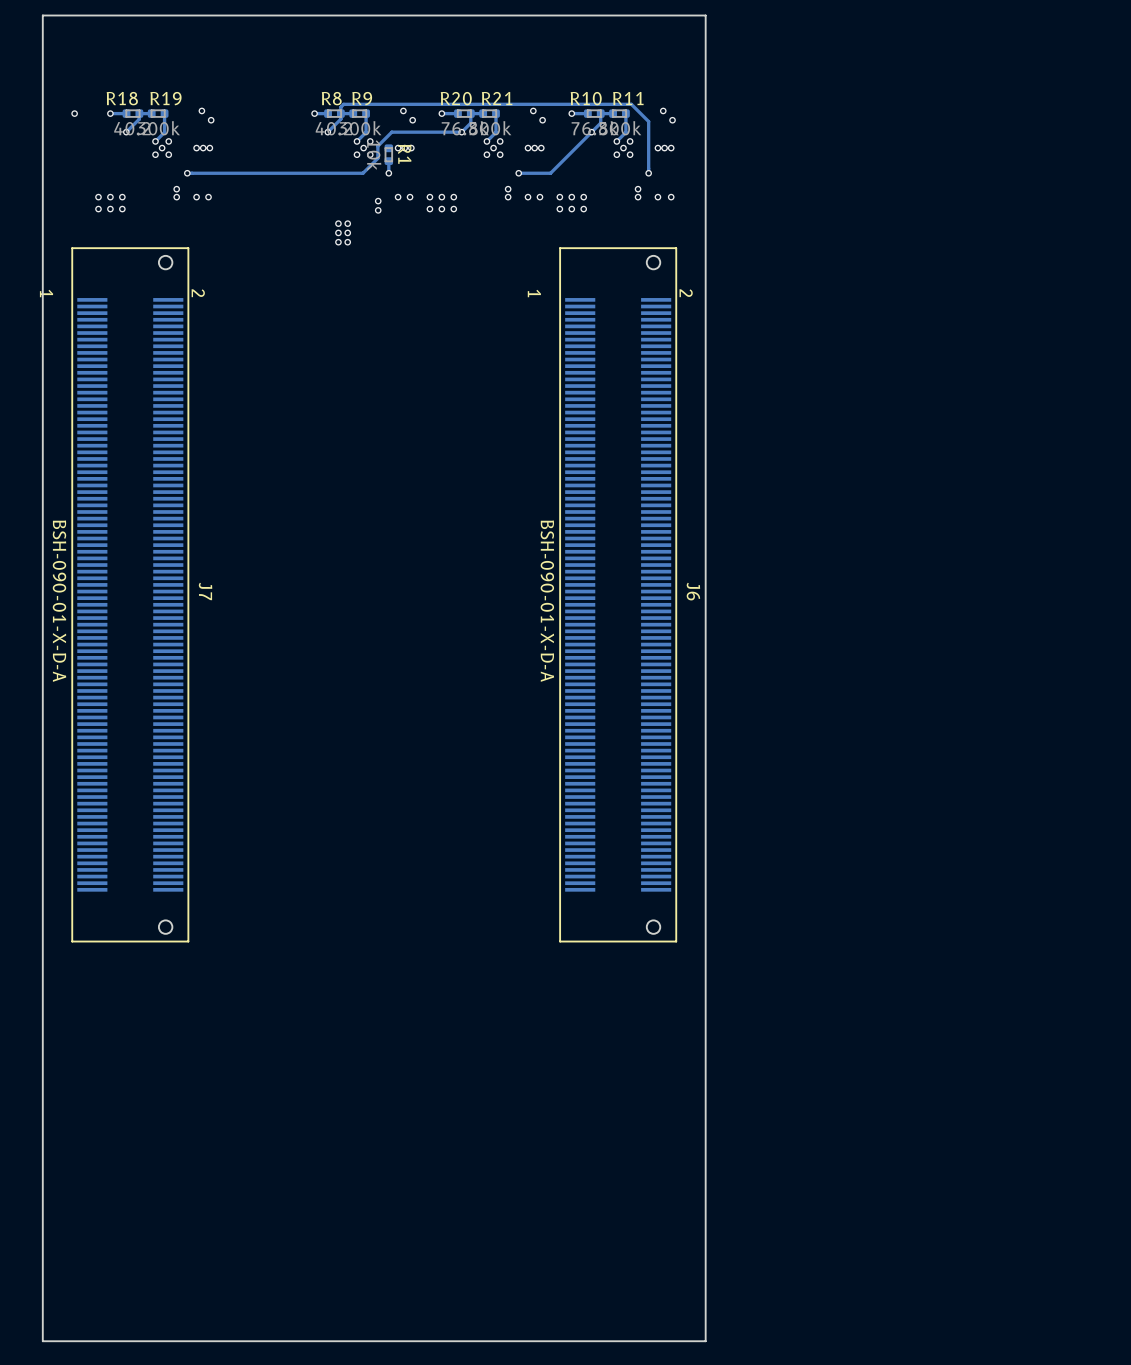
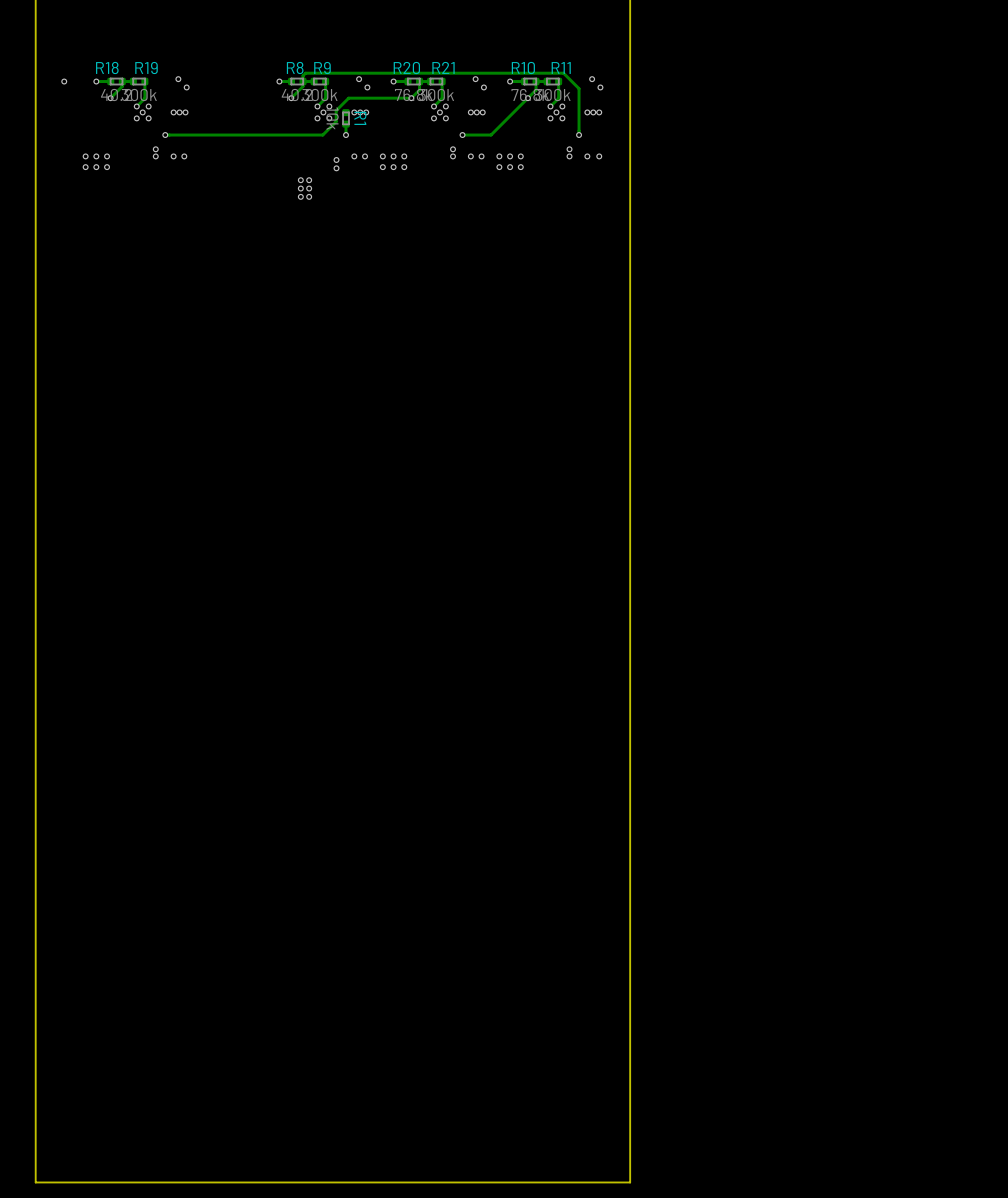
J7: BSH-090-01-X-D-A (130, 594) -> none
J6: BSH-090-01-X-D-A (618, 594) -> none

